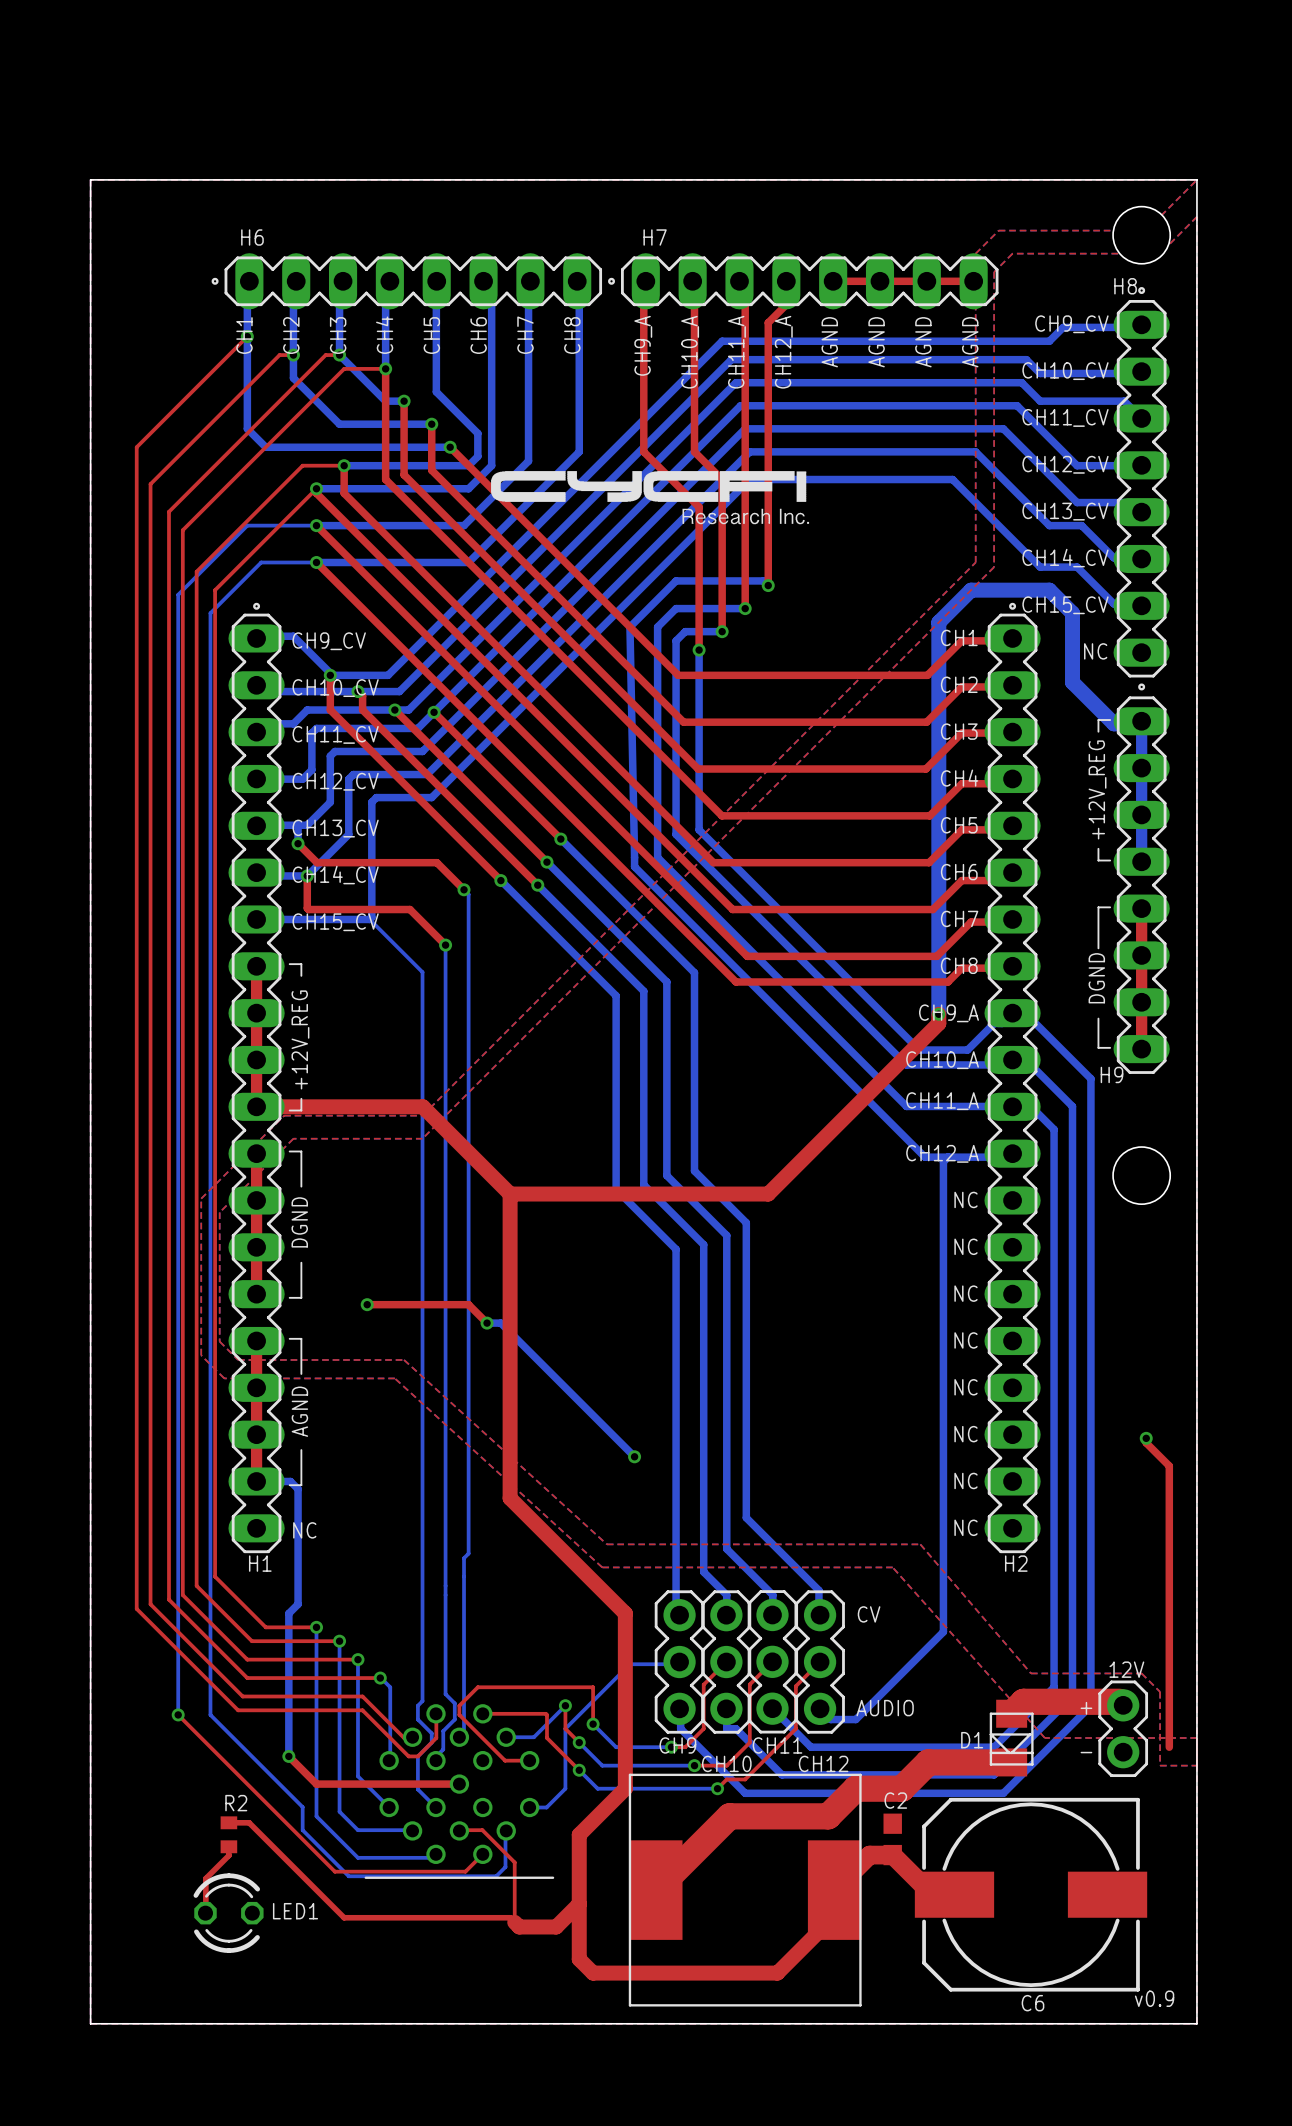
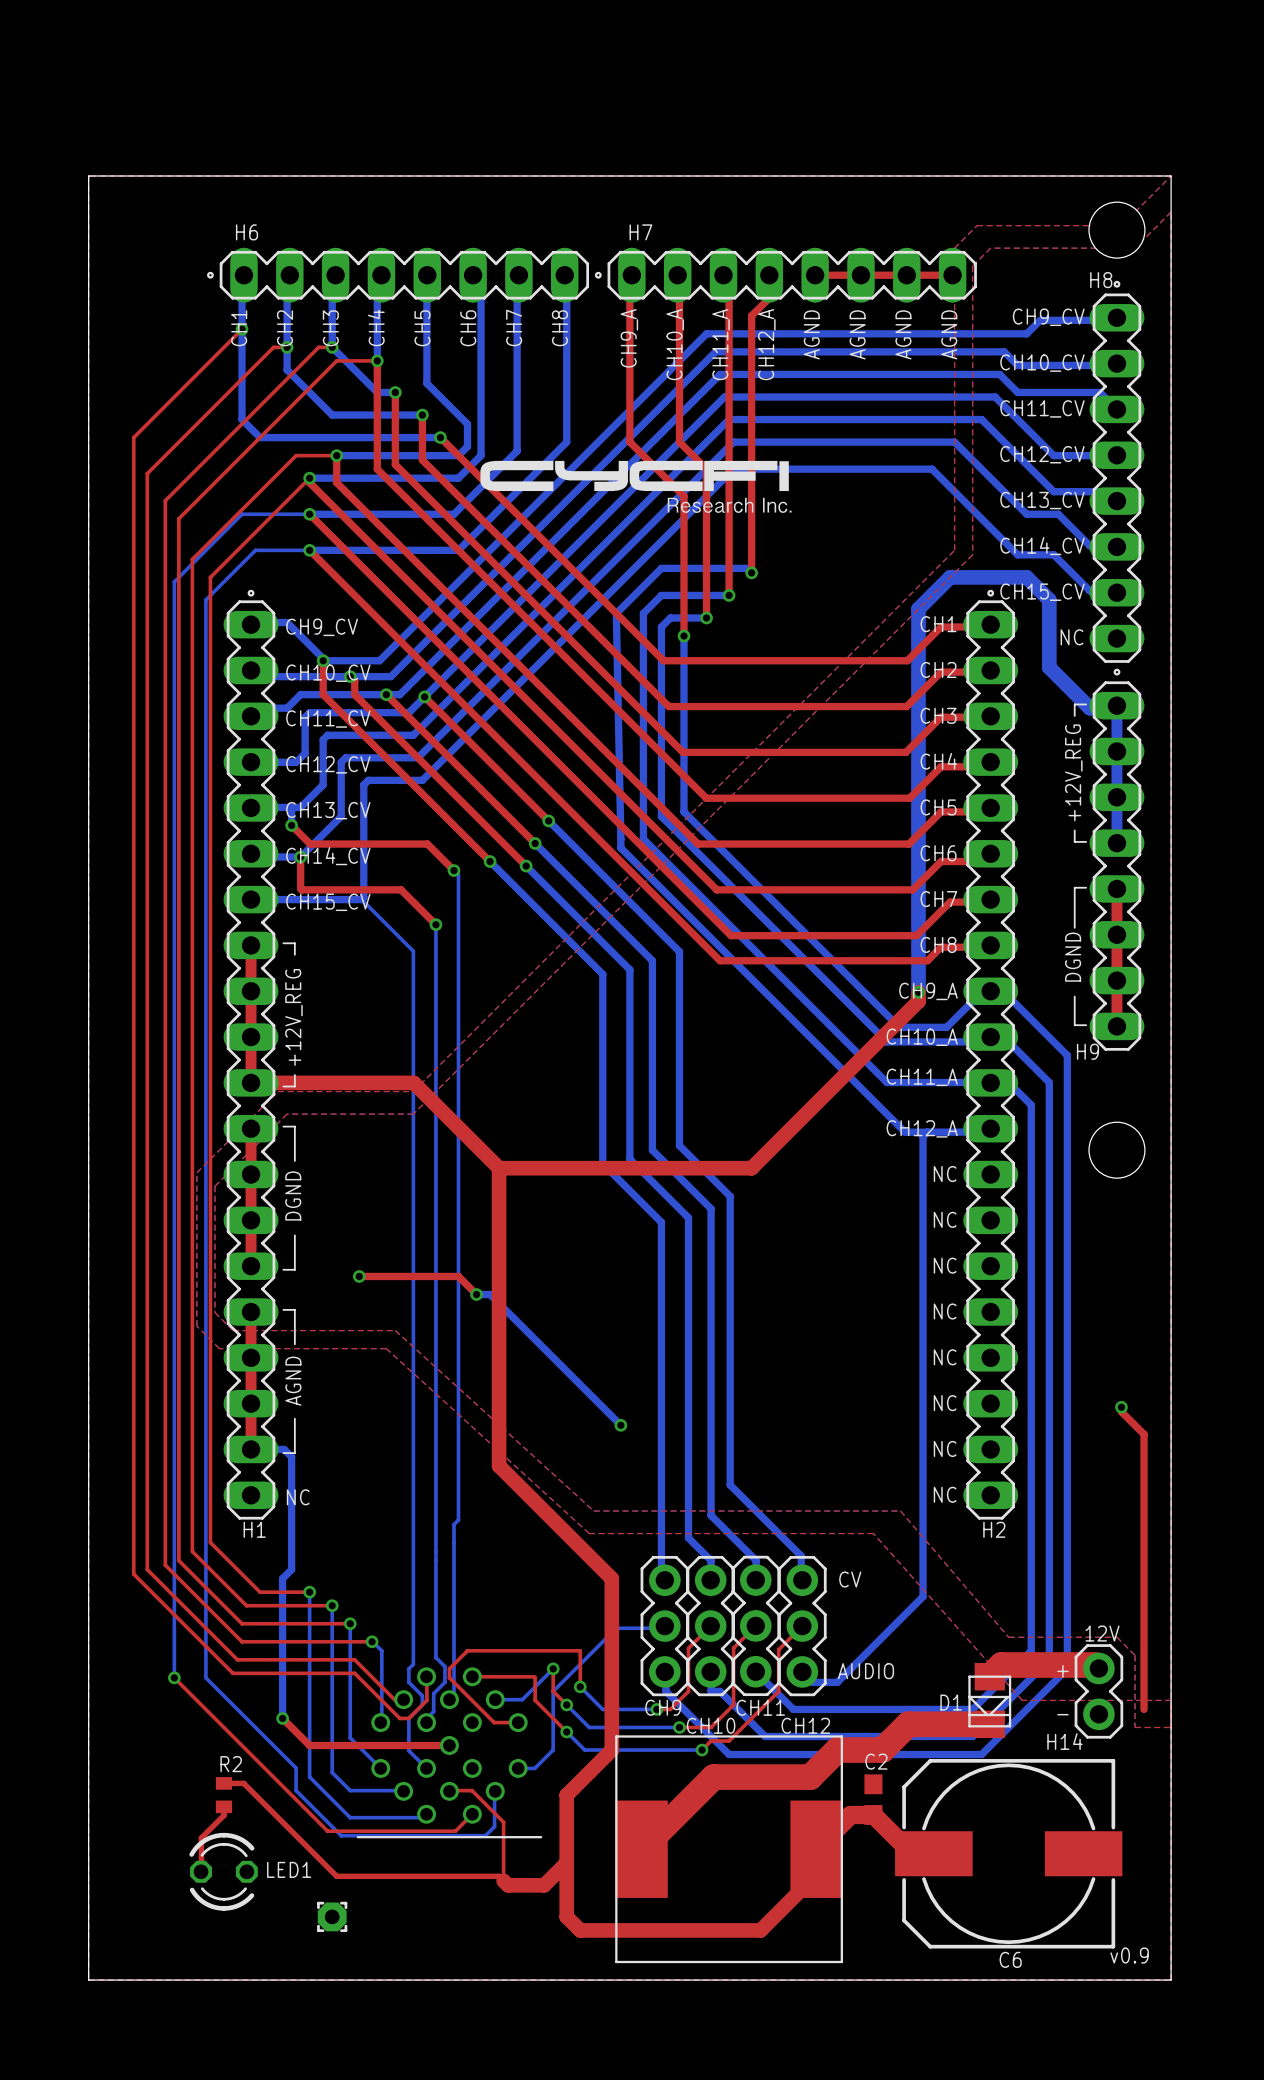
text: none -> H14 (1064, 1741)
part: none -> (332, 1916)

